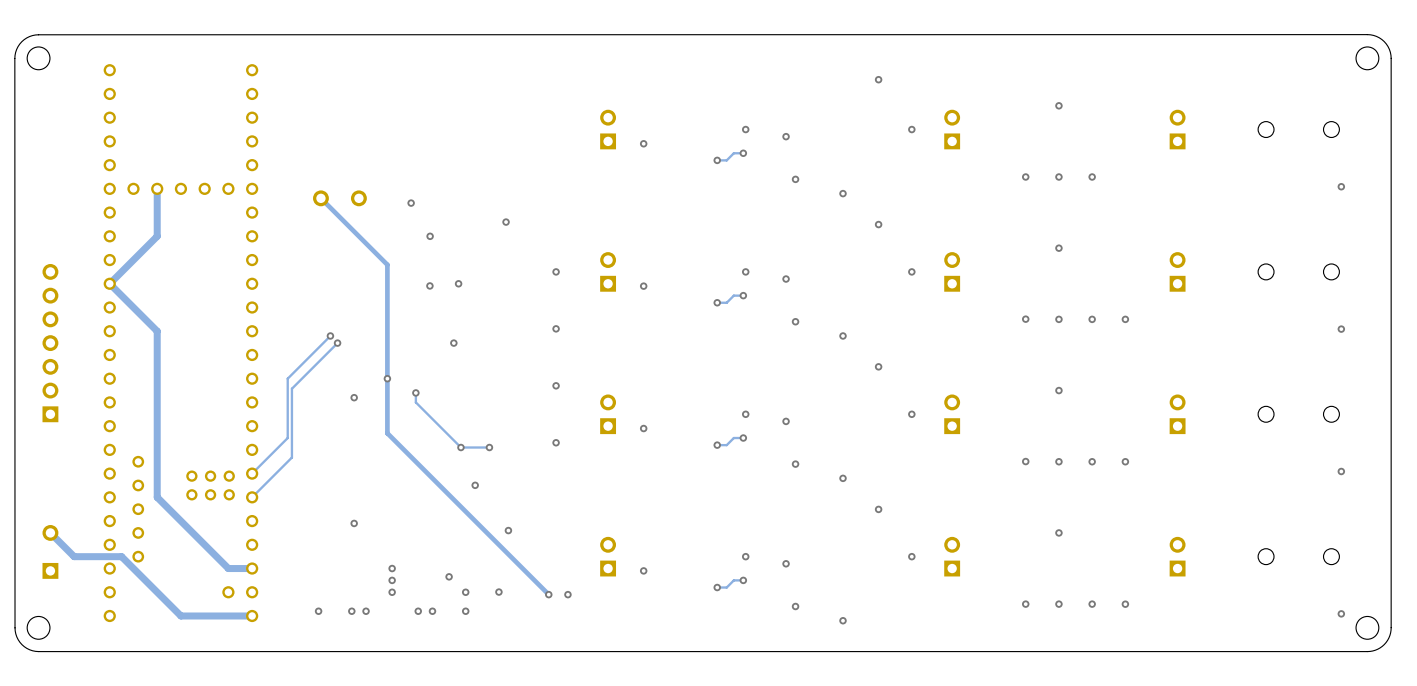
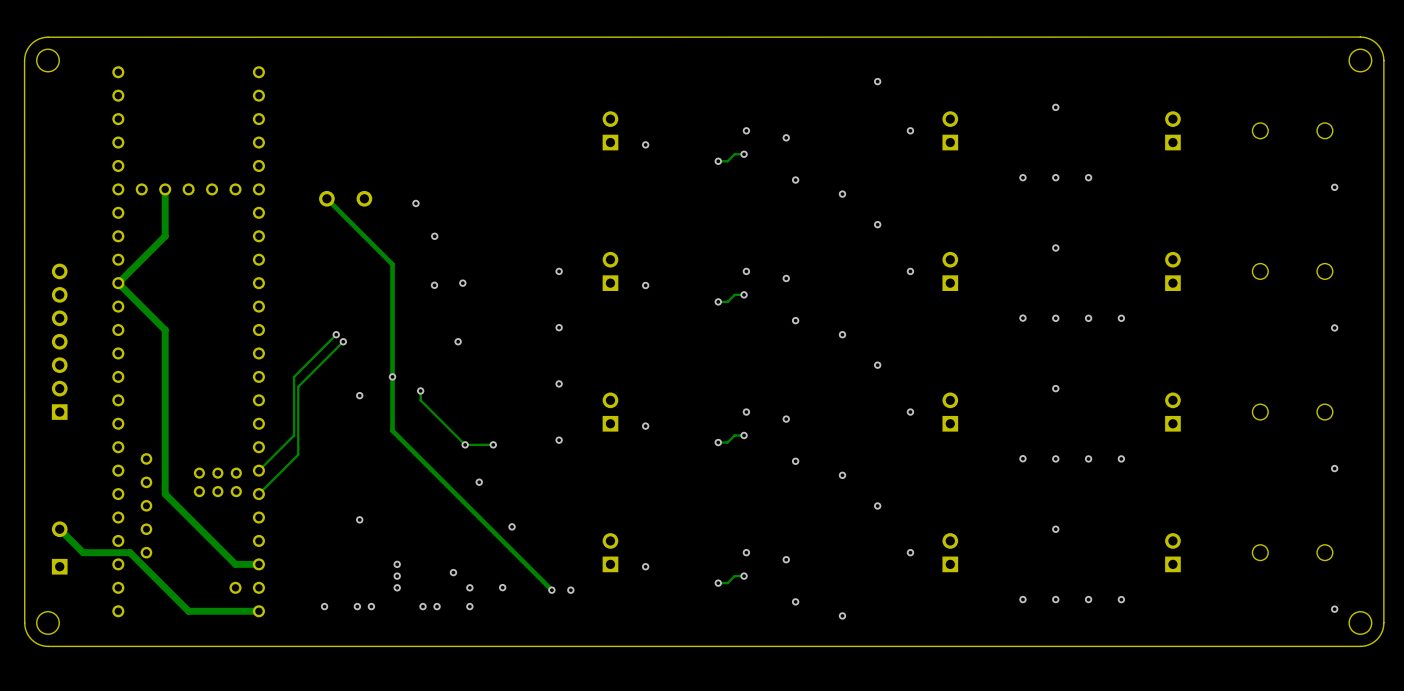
via: (506, 222) -> none

